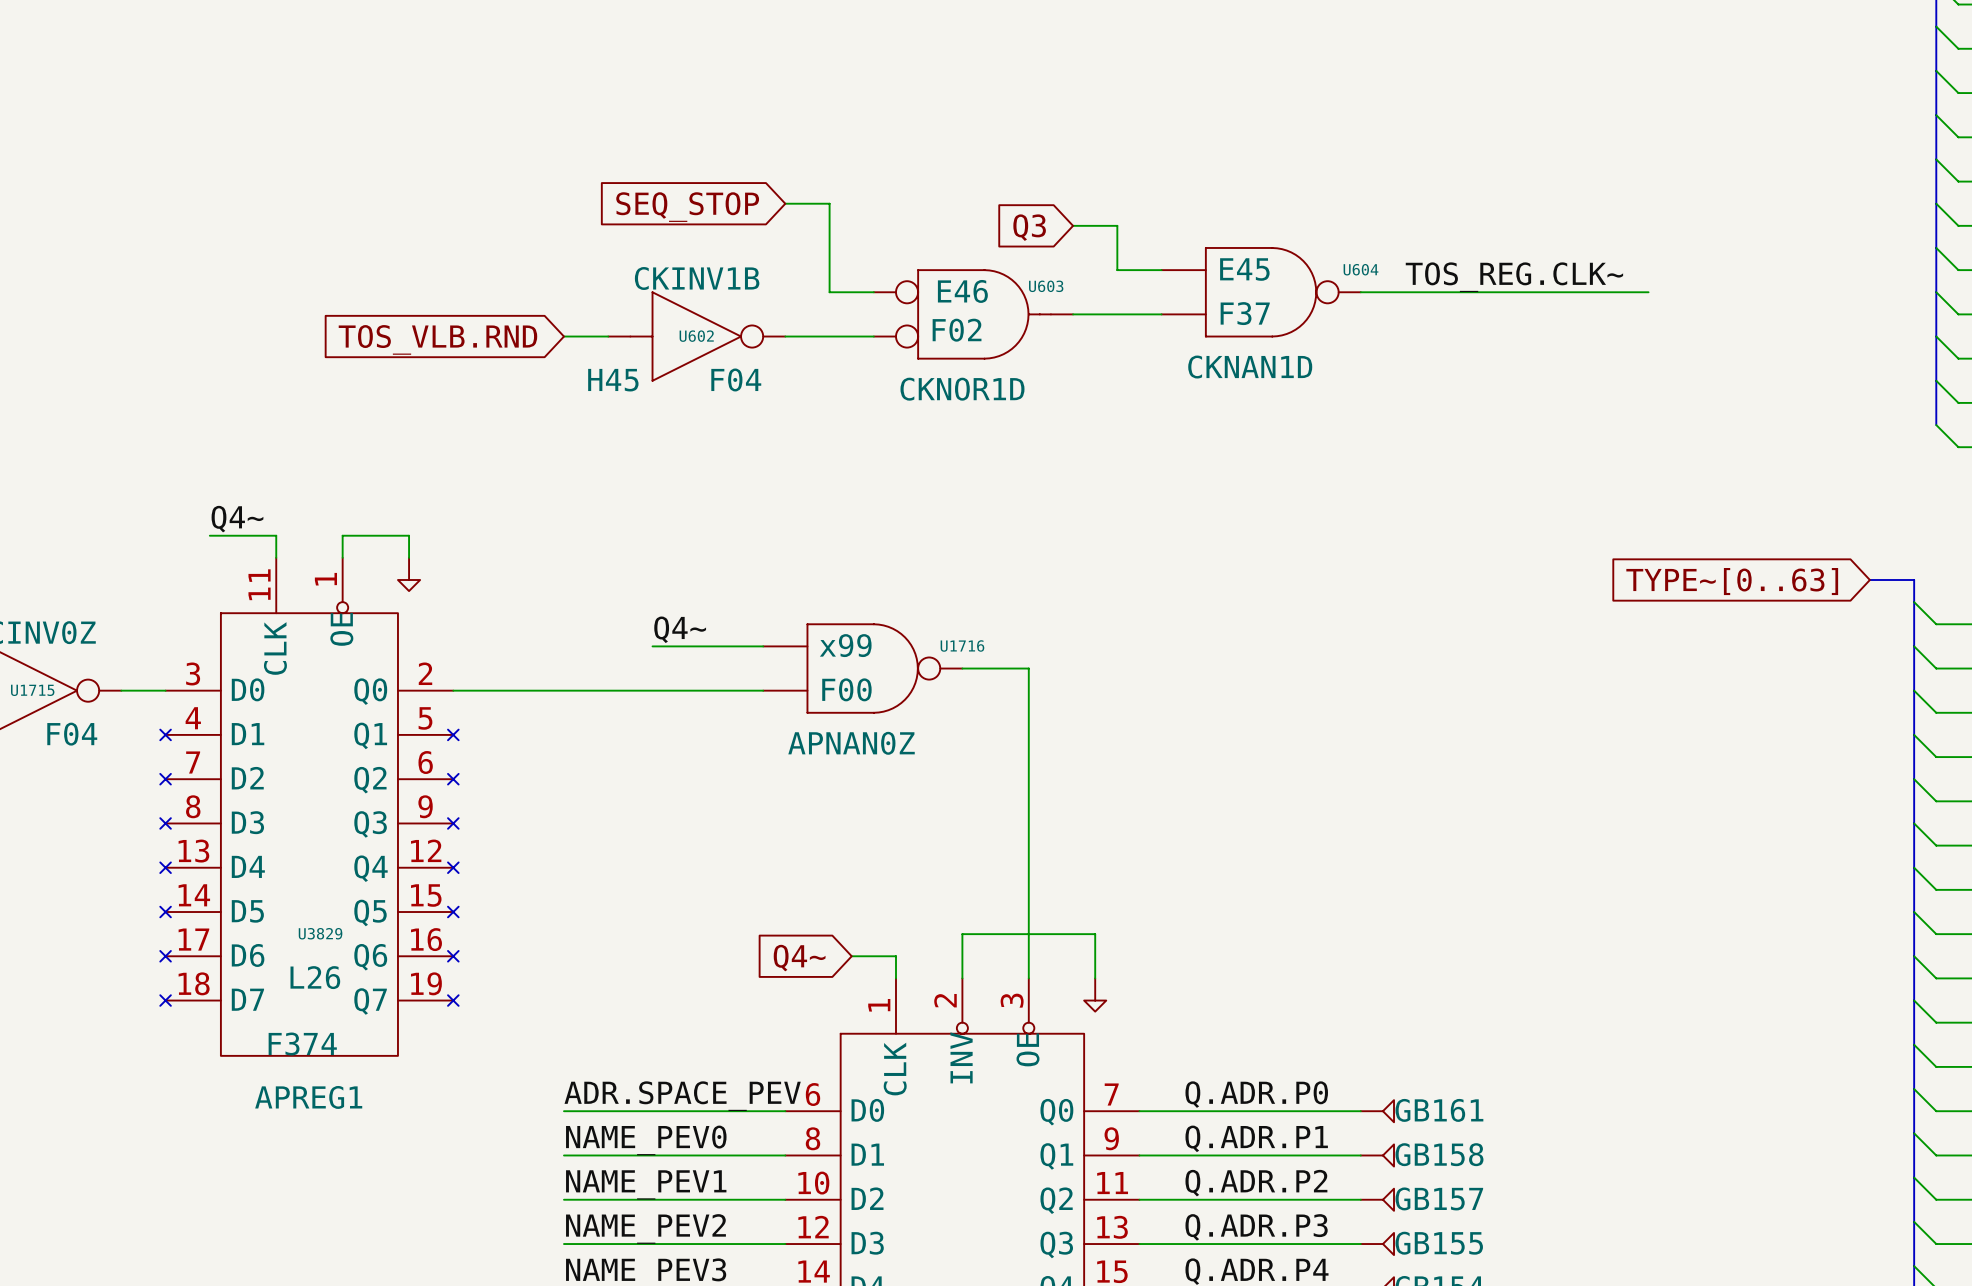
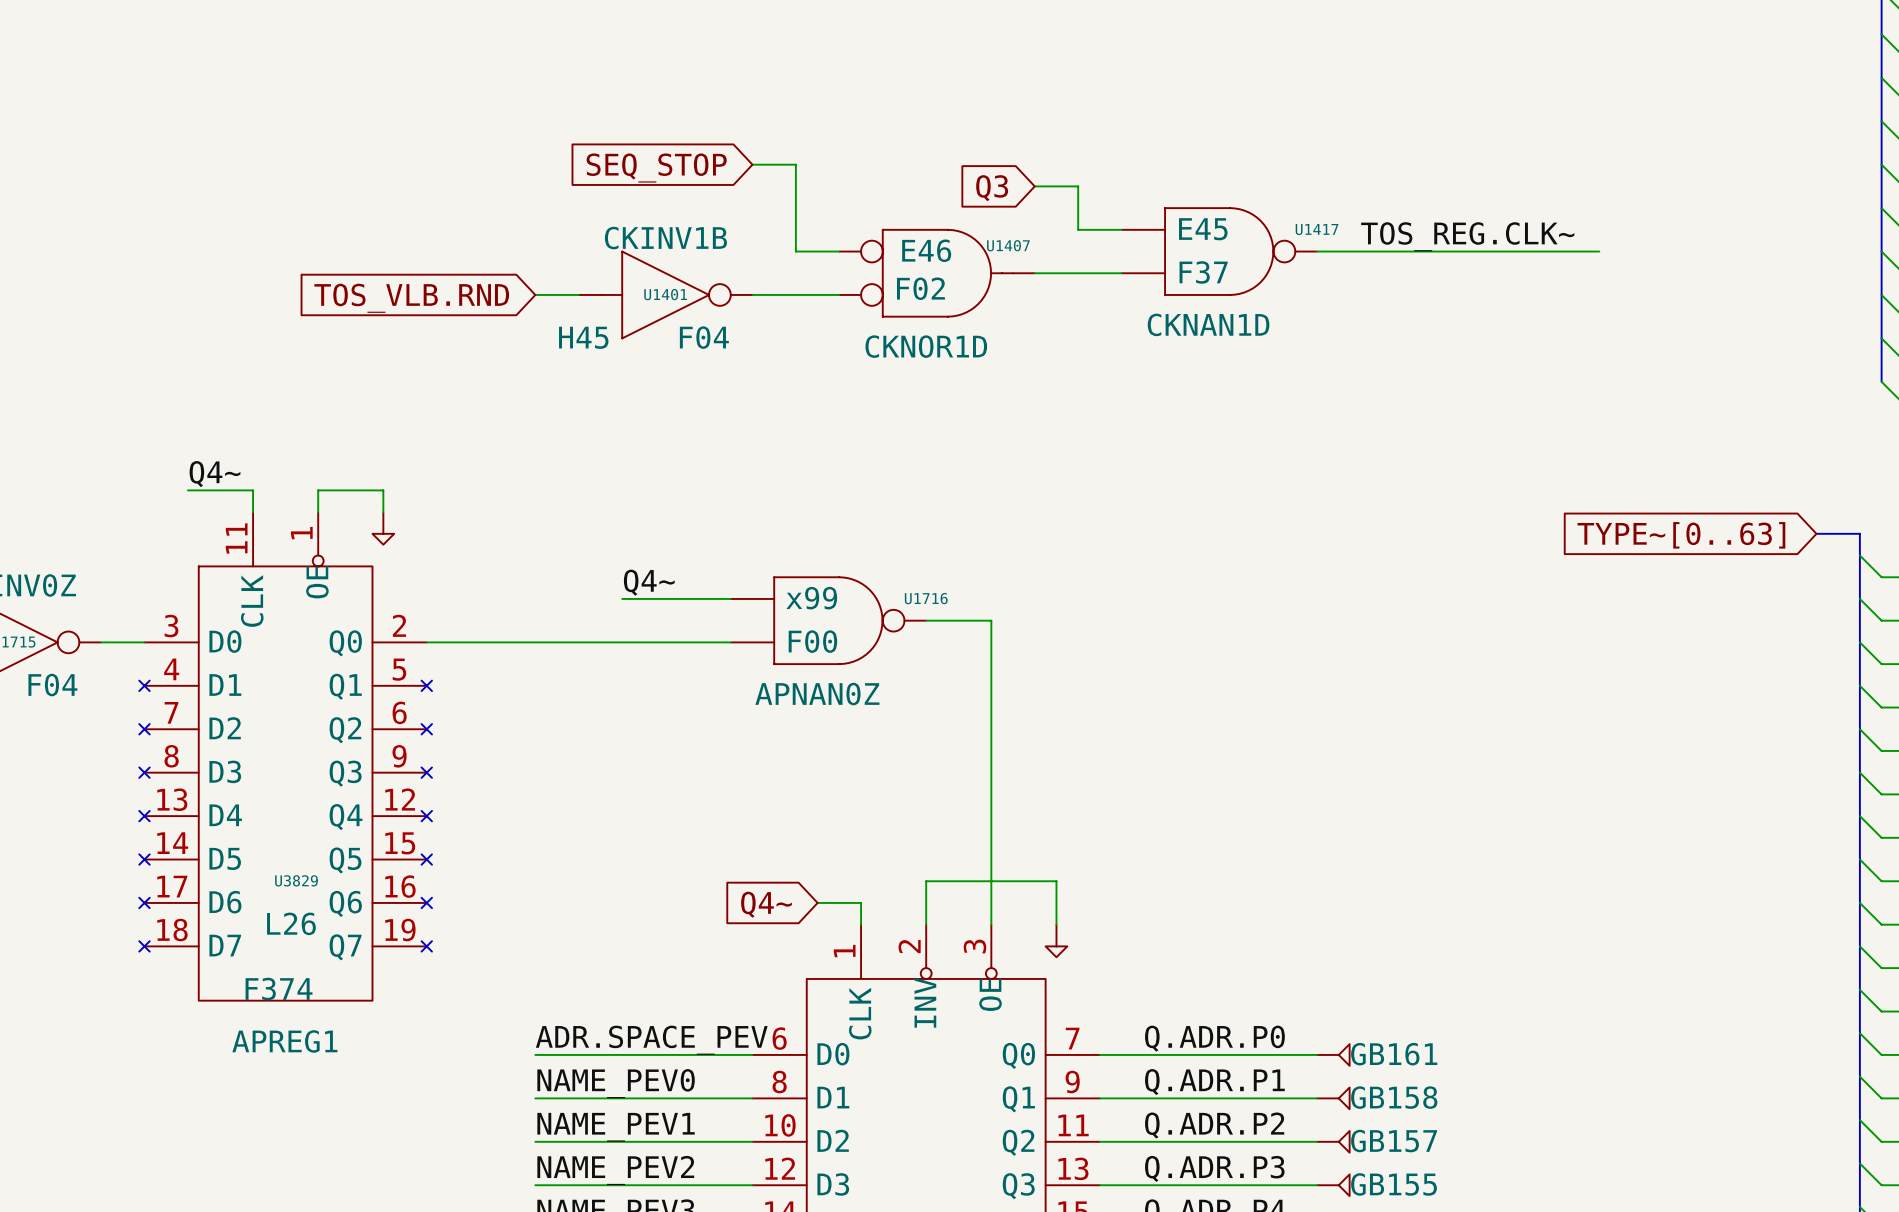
U604 name: U604 (1360, 269) -> U1417 (1317, 229)
U603 name: U603 (1046, 286) -> U1407 (1008, 245)
U602 name: U602 (696, 336) -> U1401 (665, 294)

